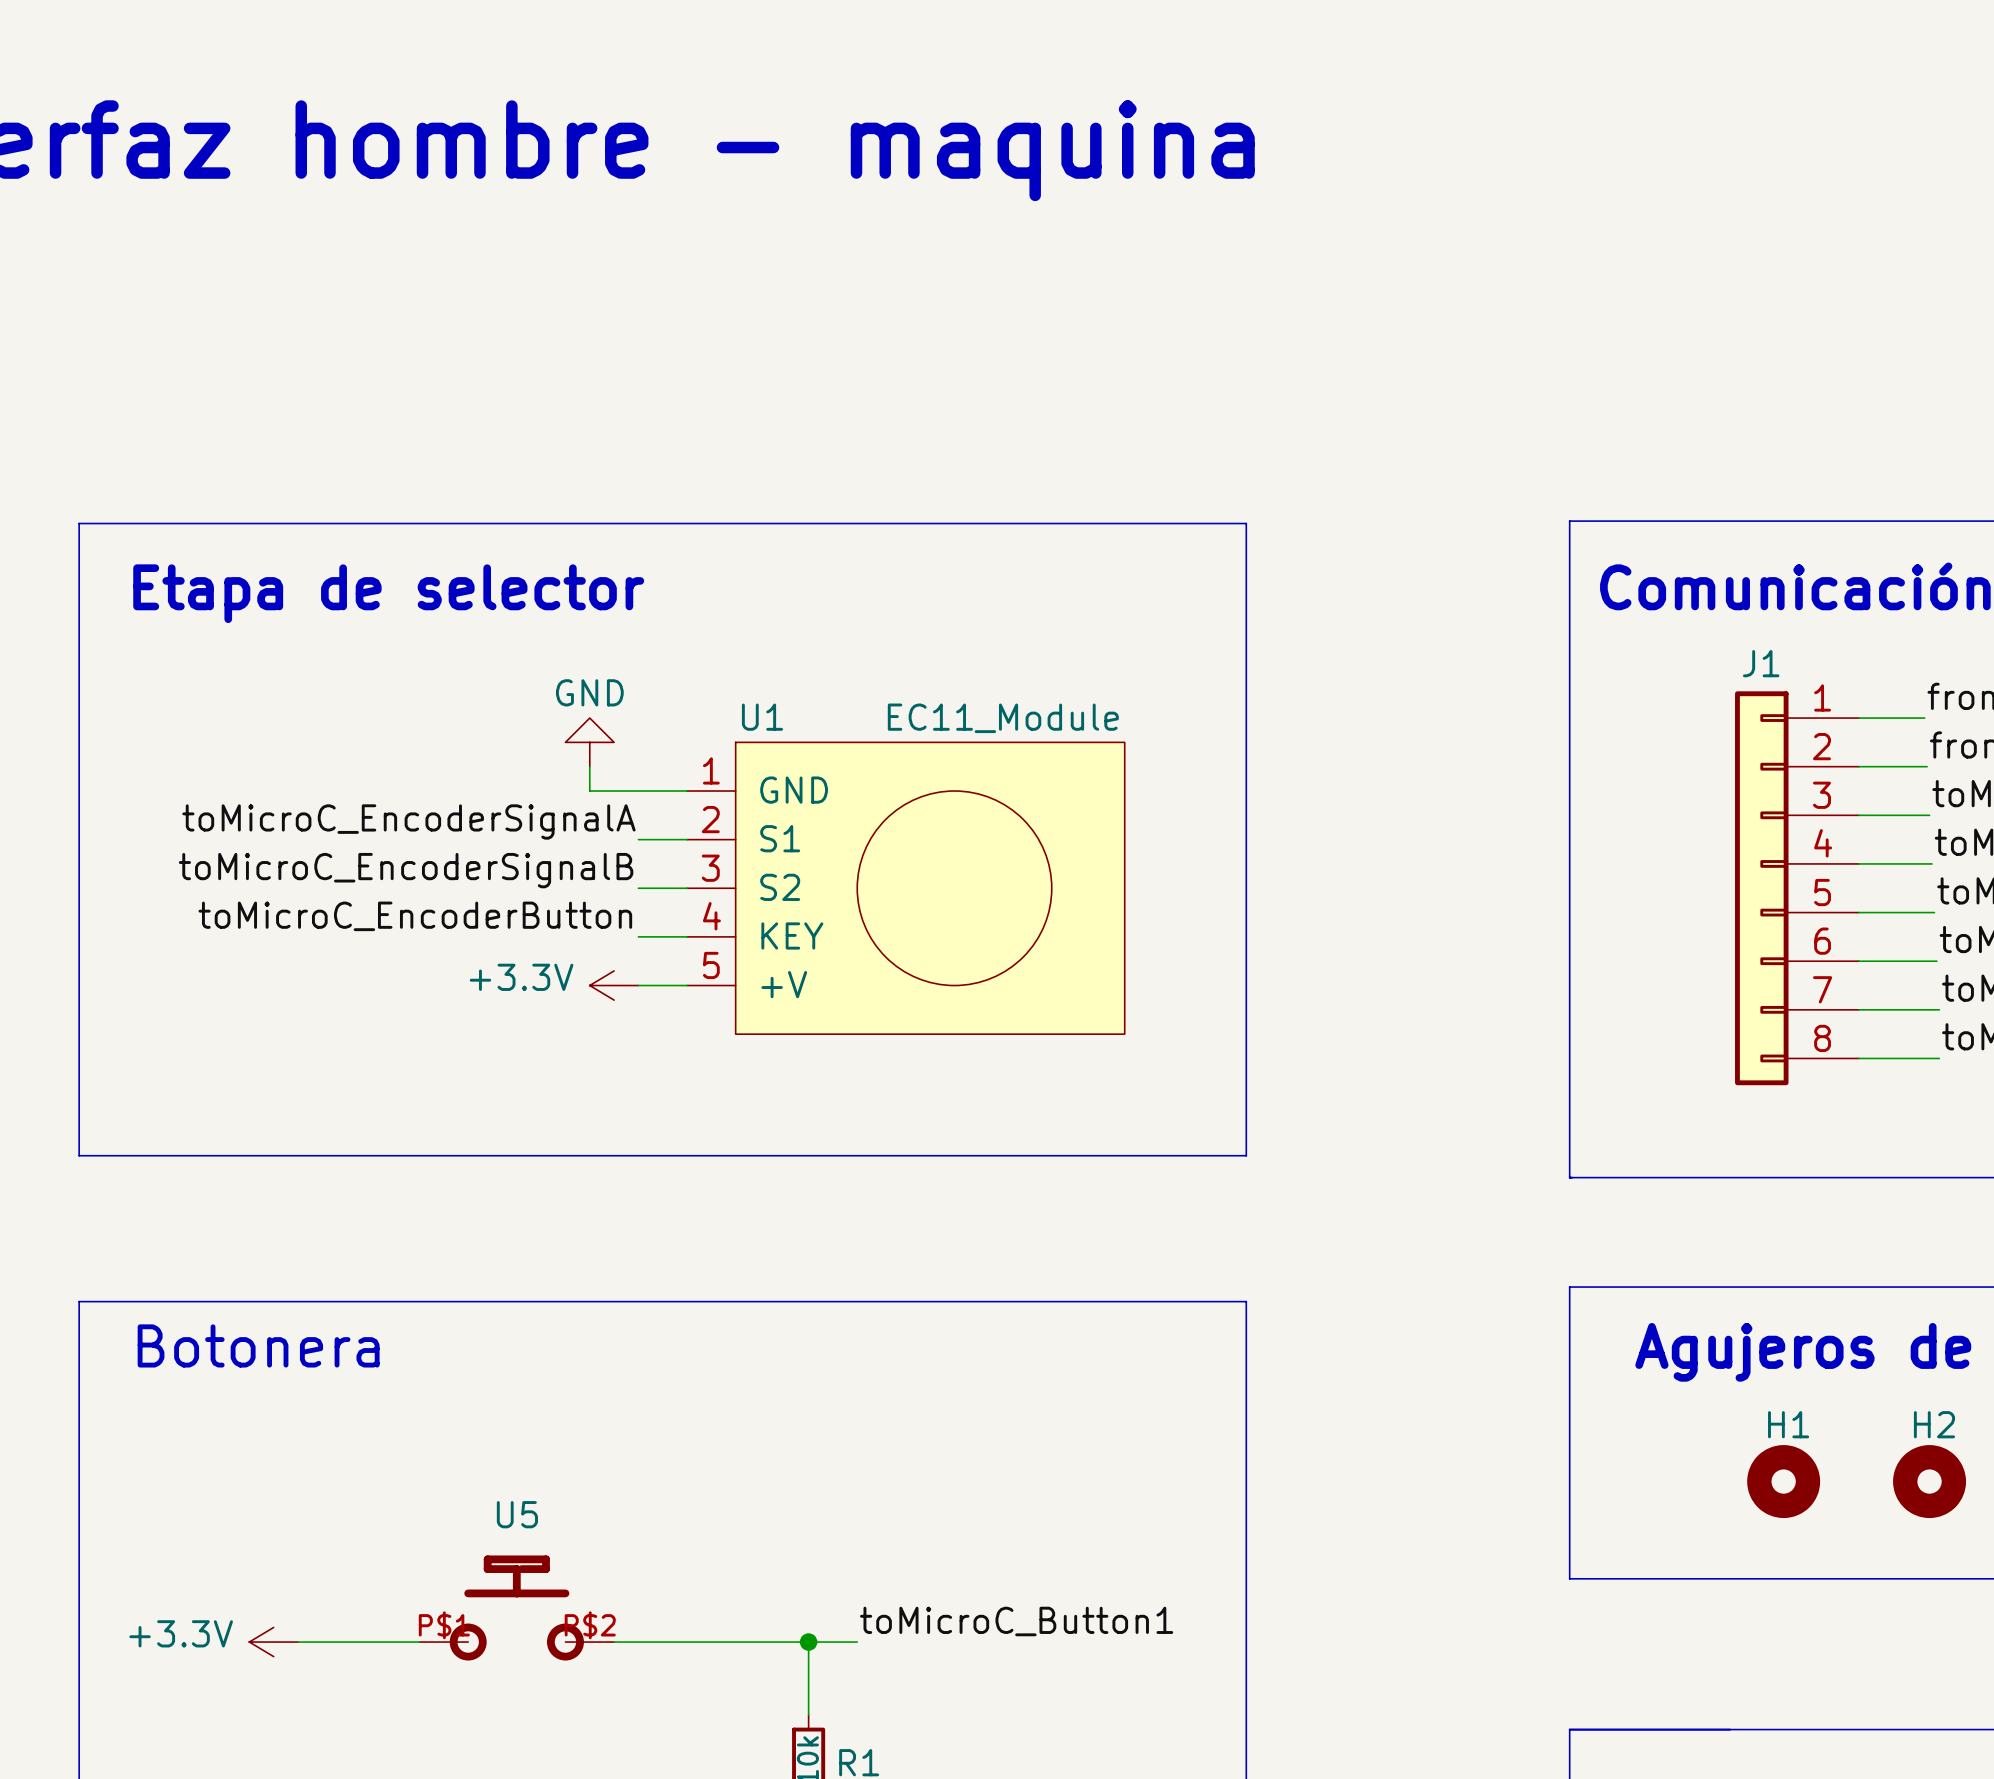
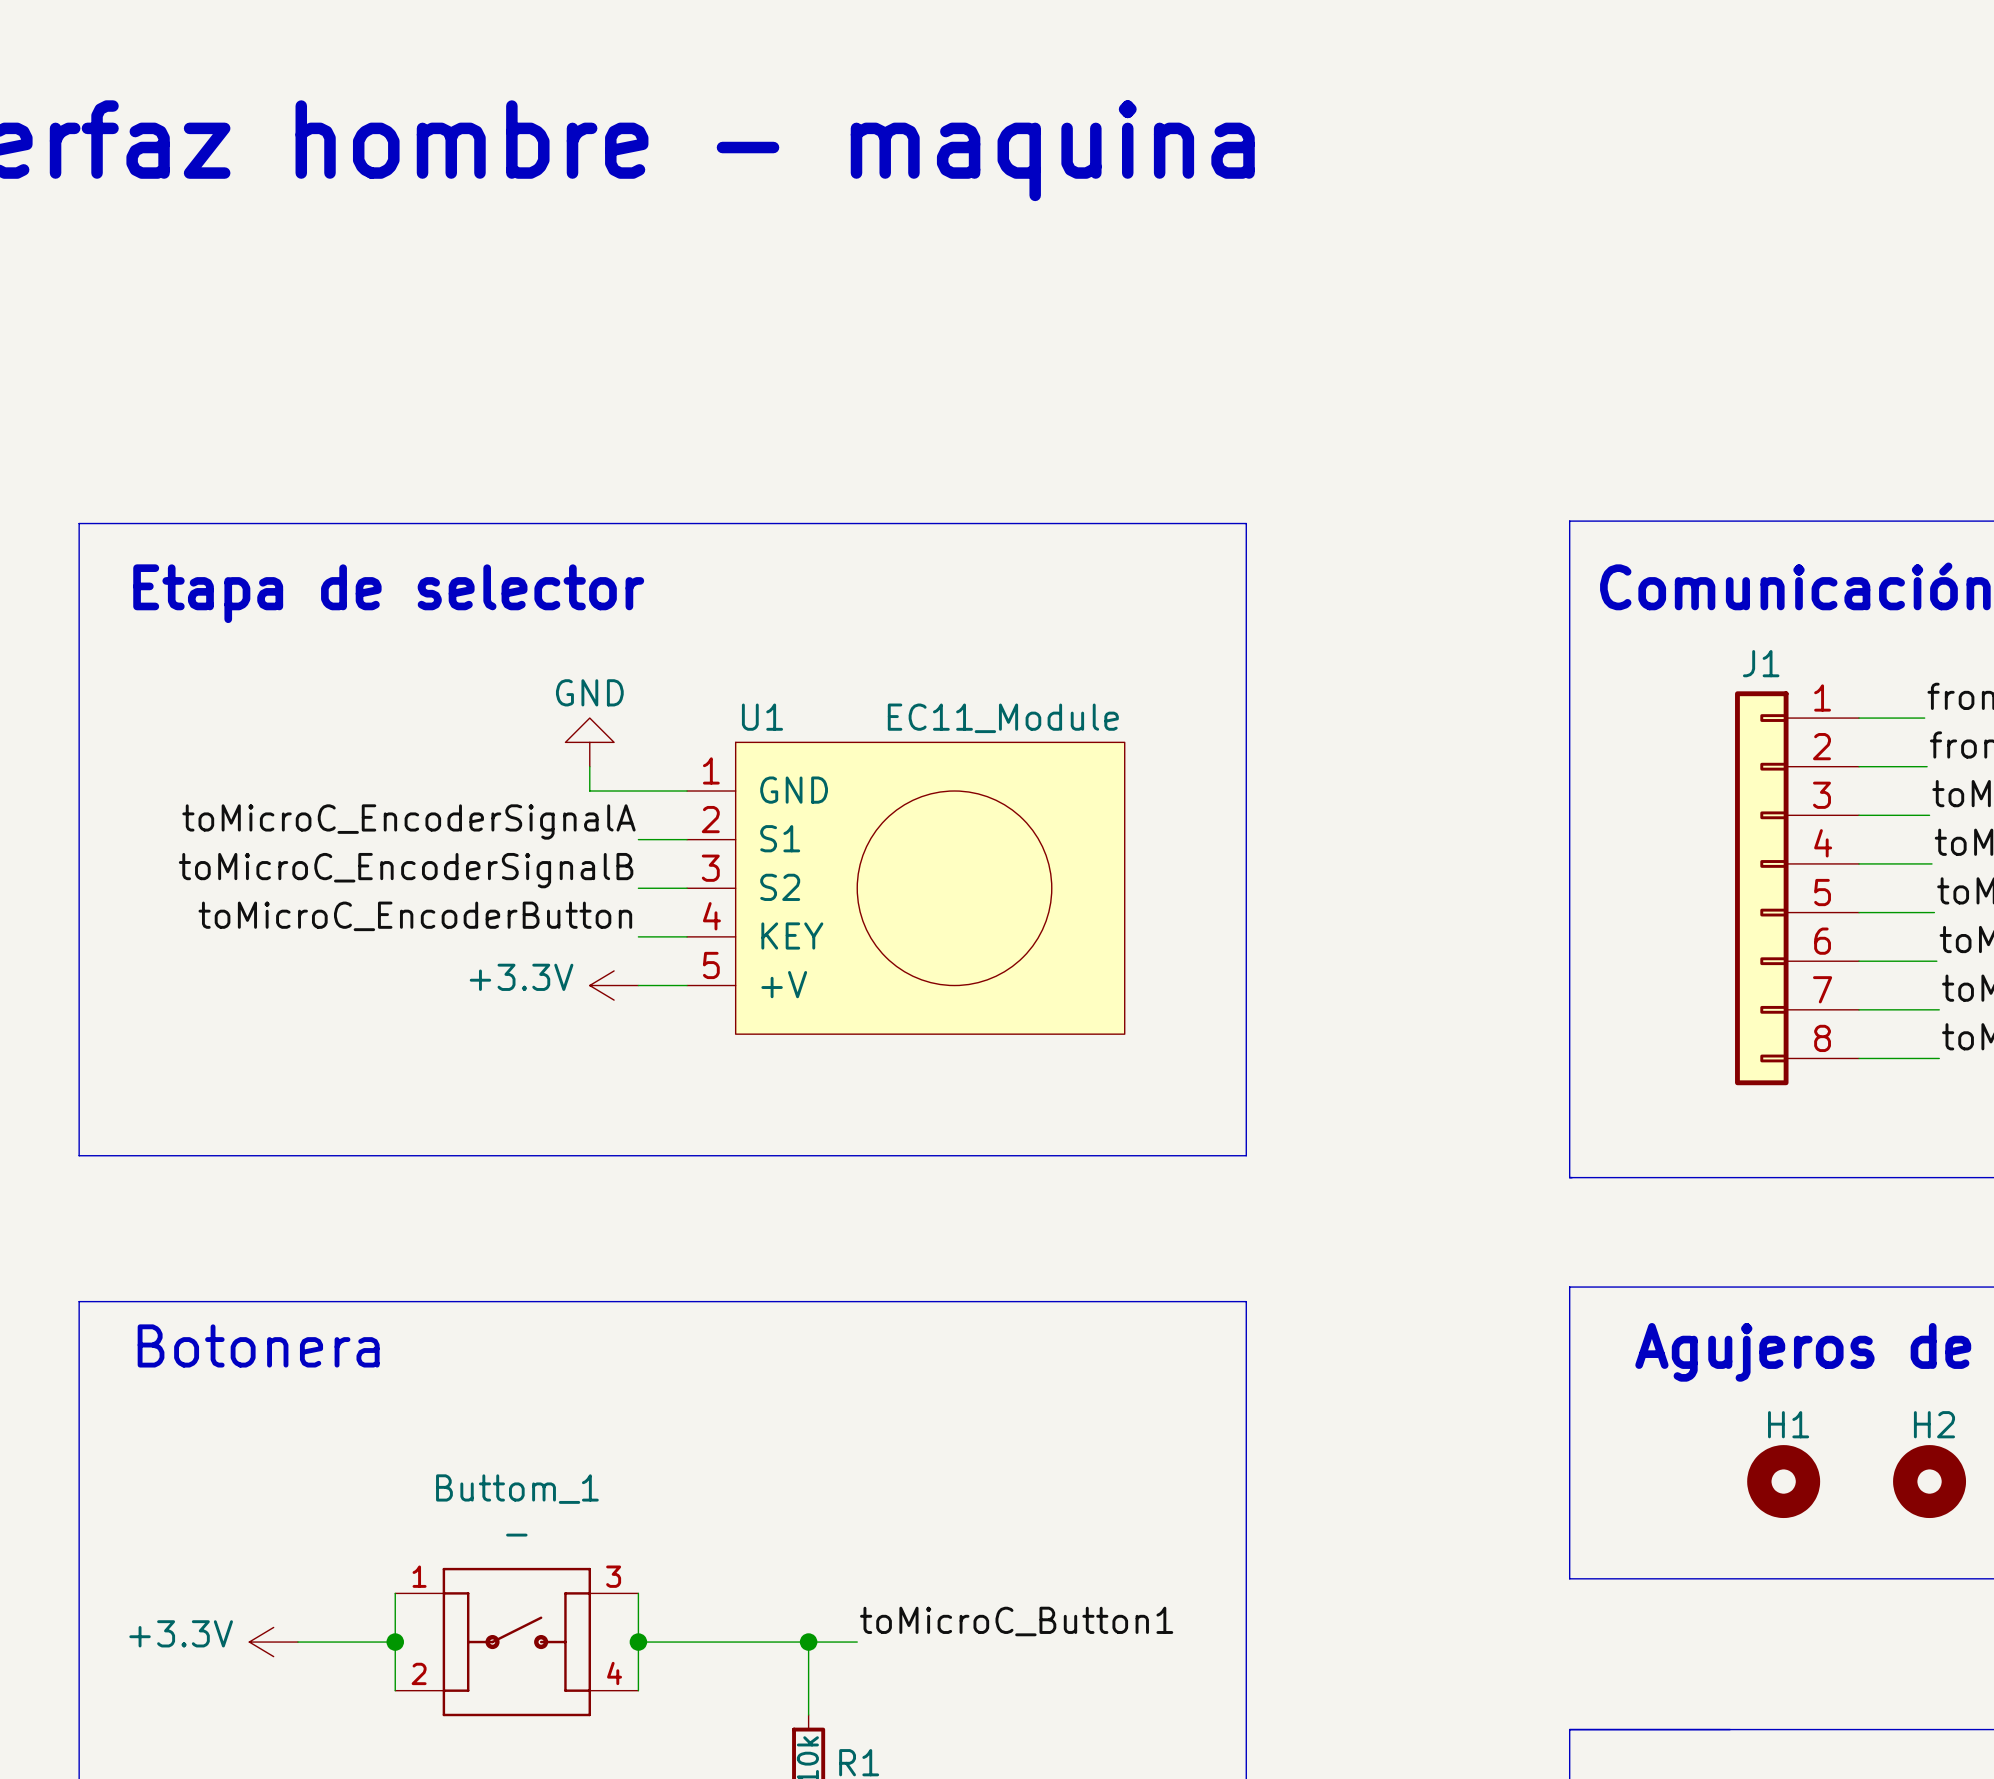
wire: none -> (395, 1593) (395, 1690)
wire: none -> (638, 1593) (638, 1690)
U5: (516, 1607) -> none
wire: (395, 1642) (419, 1642) -> none
junction: none -> (395, 1642)
Buttom_1: none -> - (516, 1642)
wire: (614, 1642) (638, 1642) -> none
junction: none -> (638, 1642)

